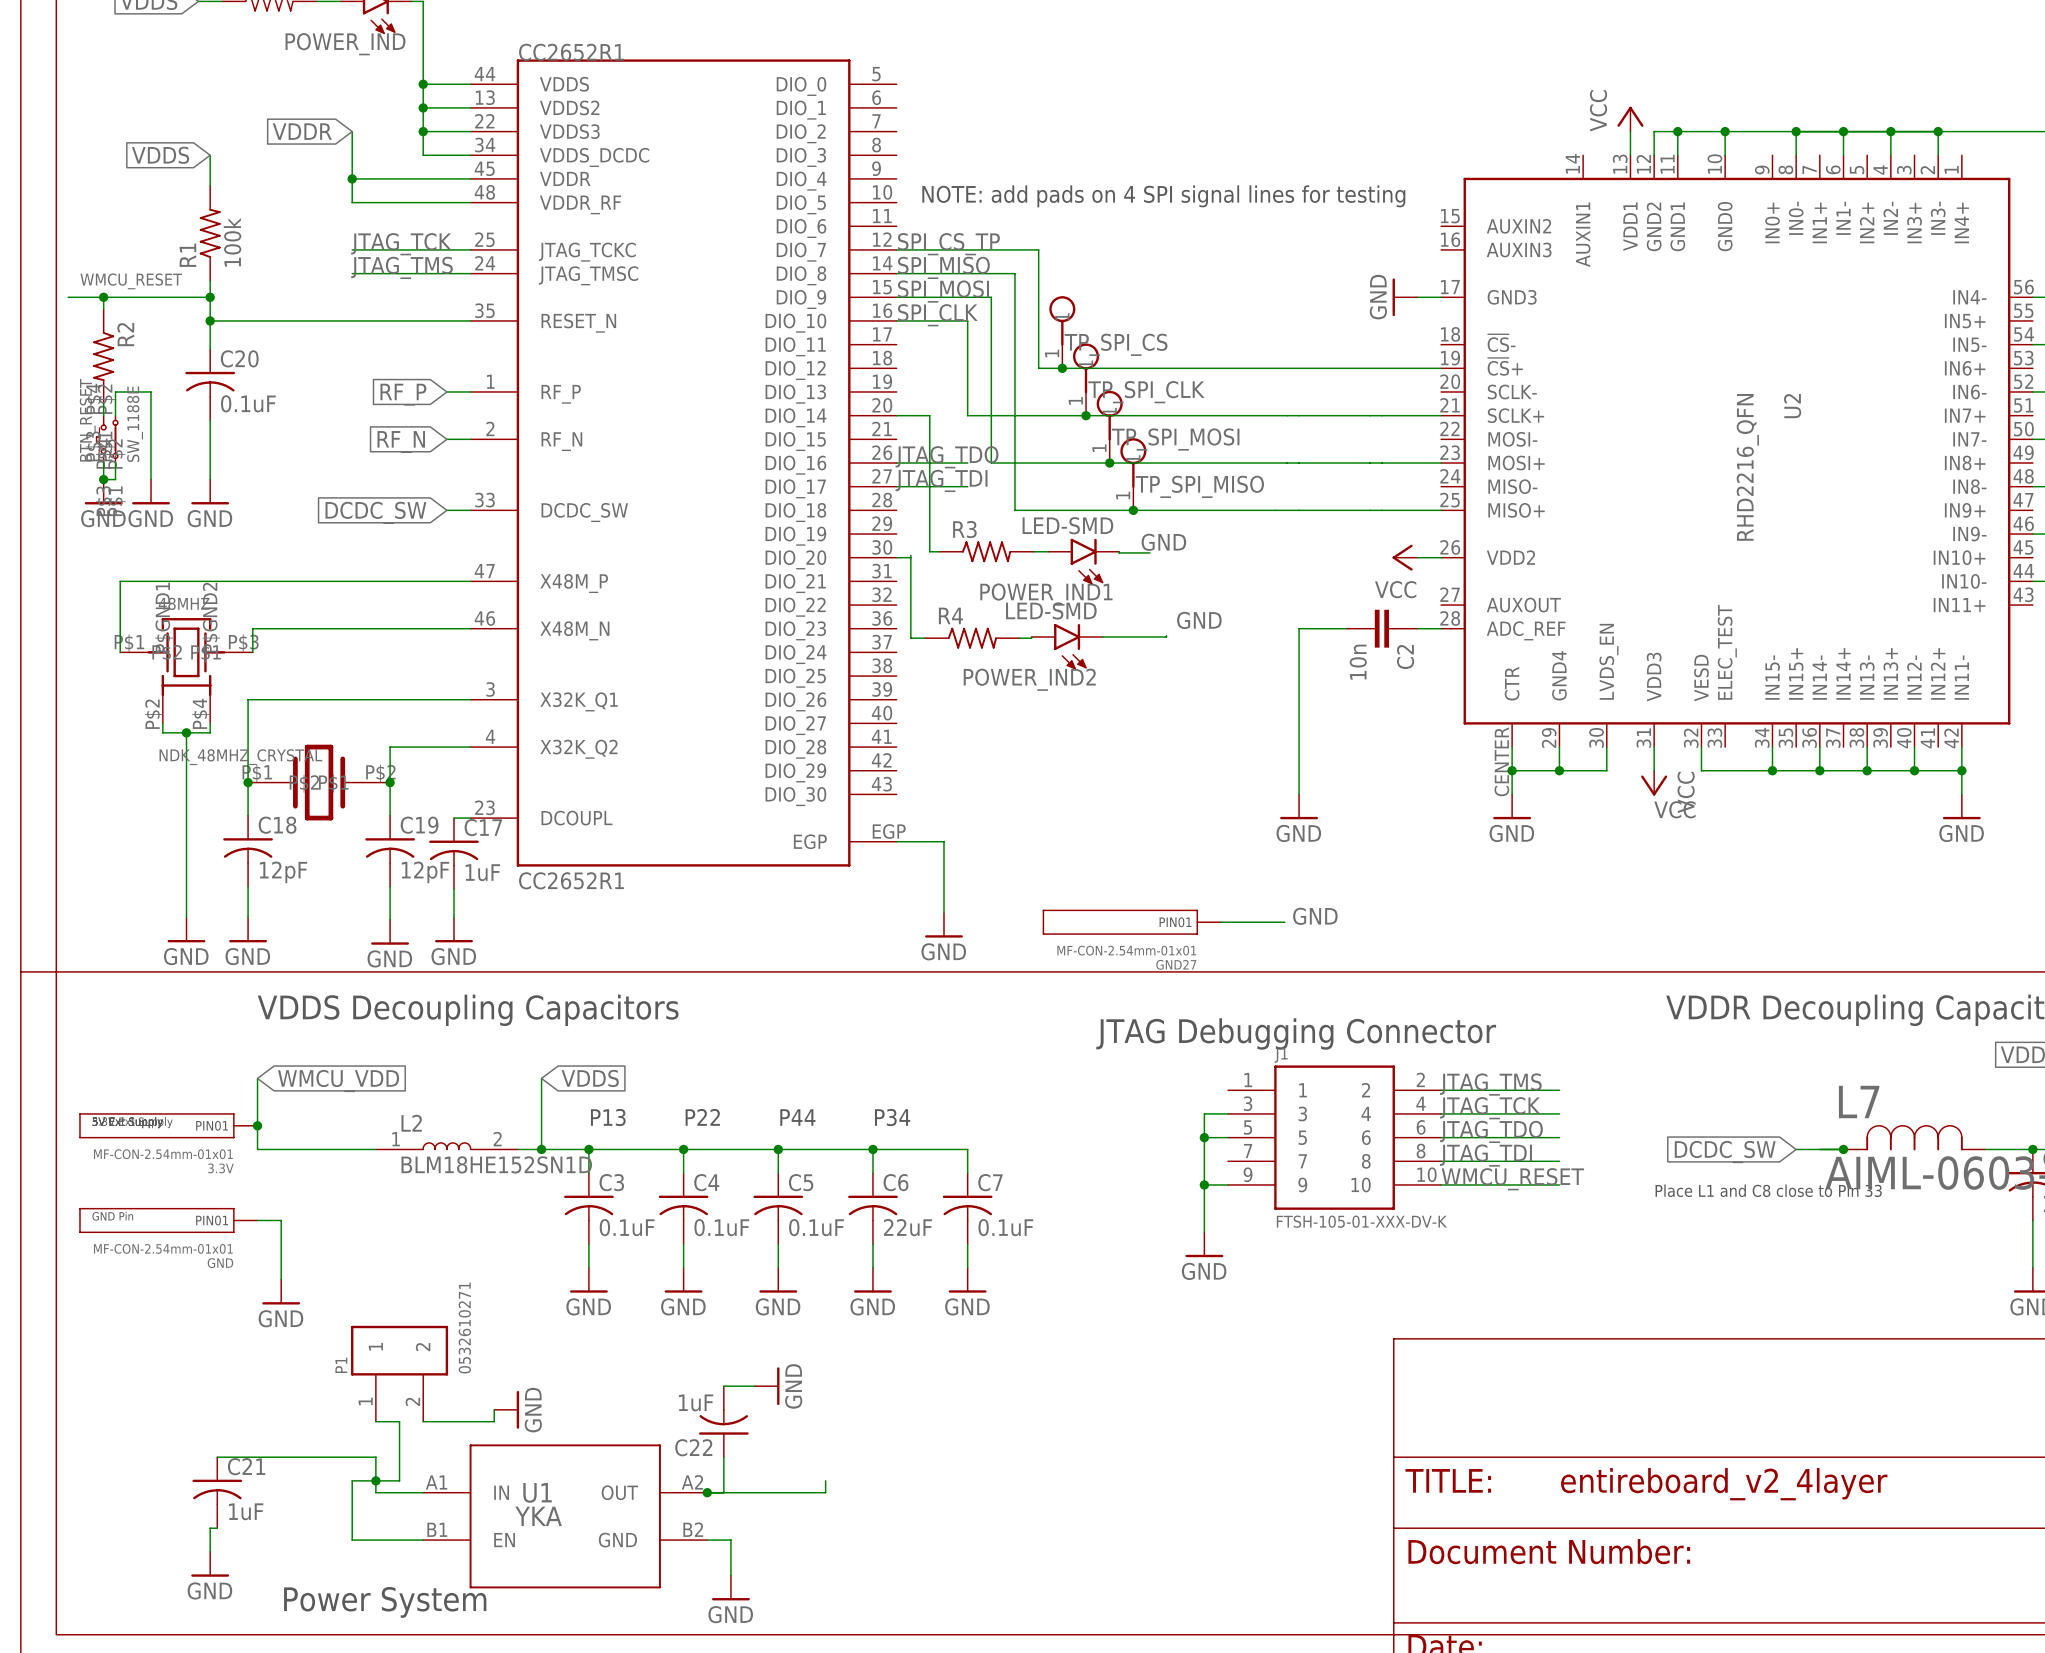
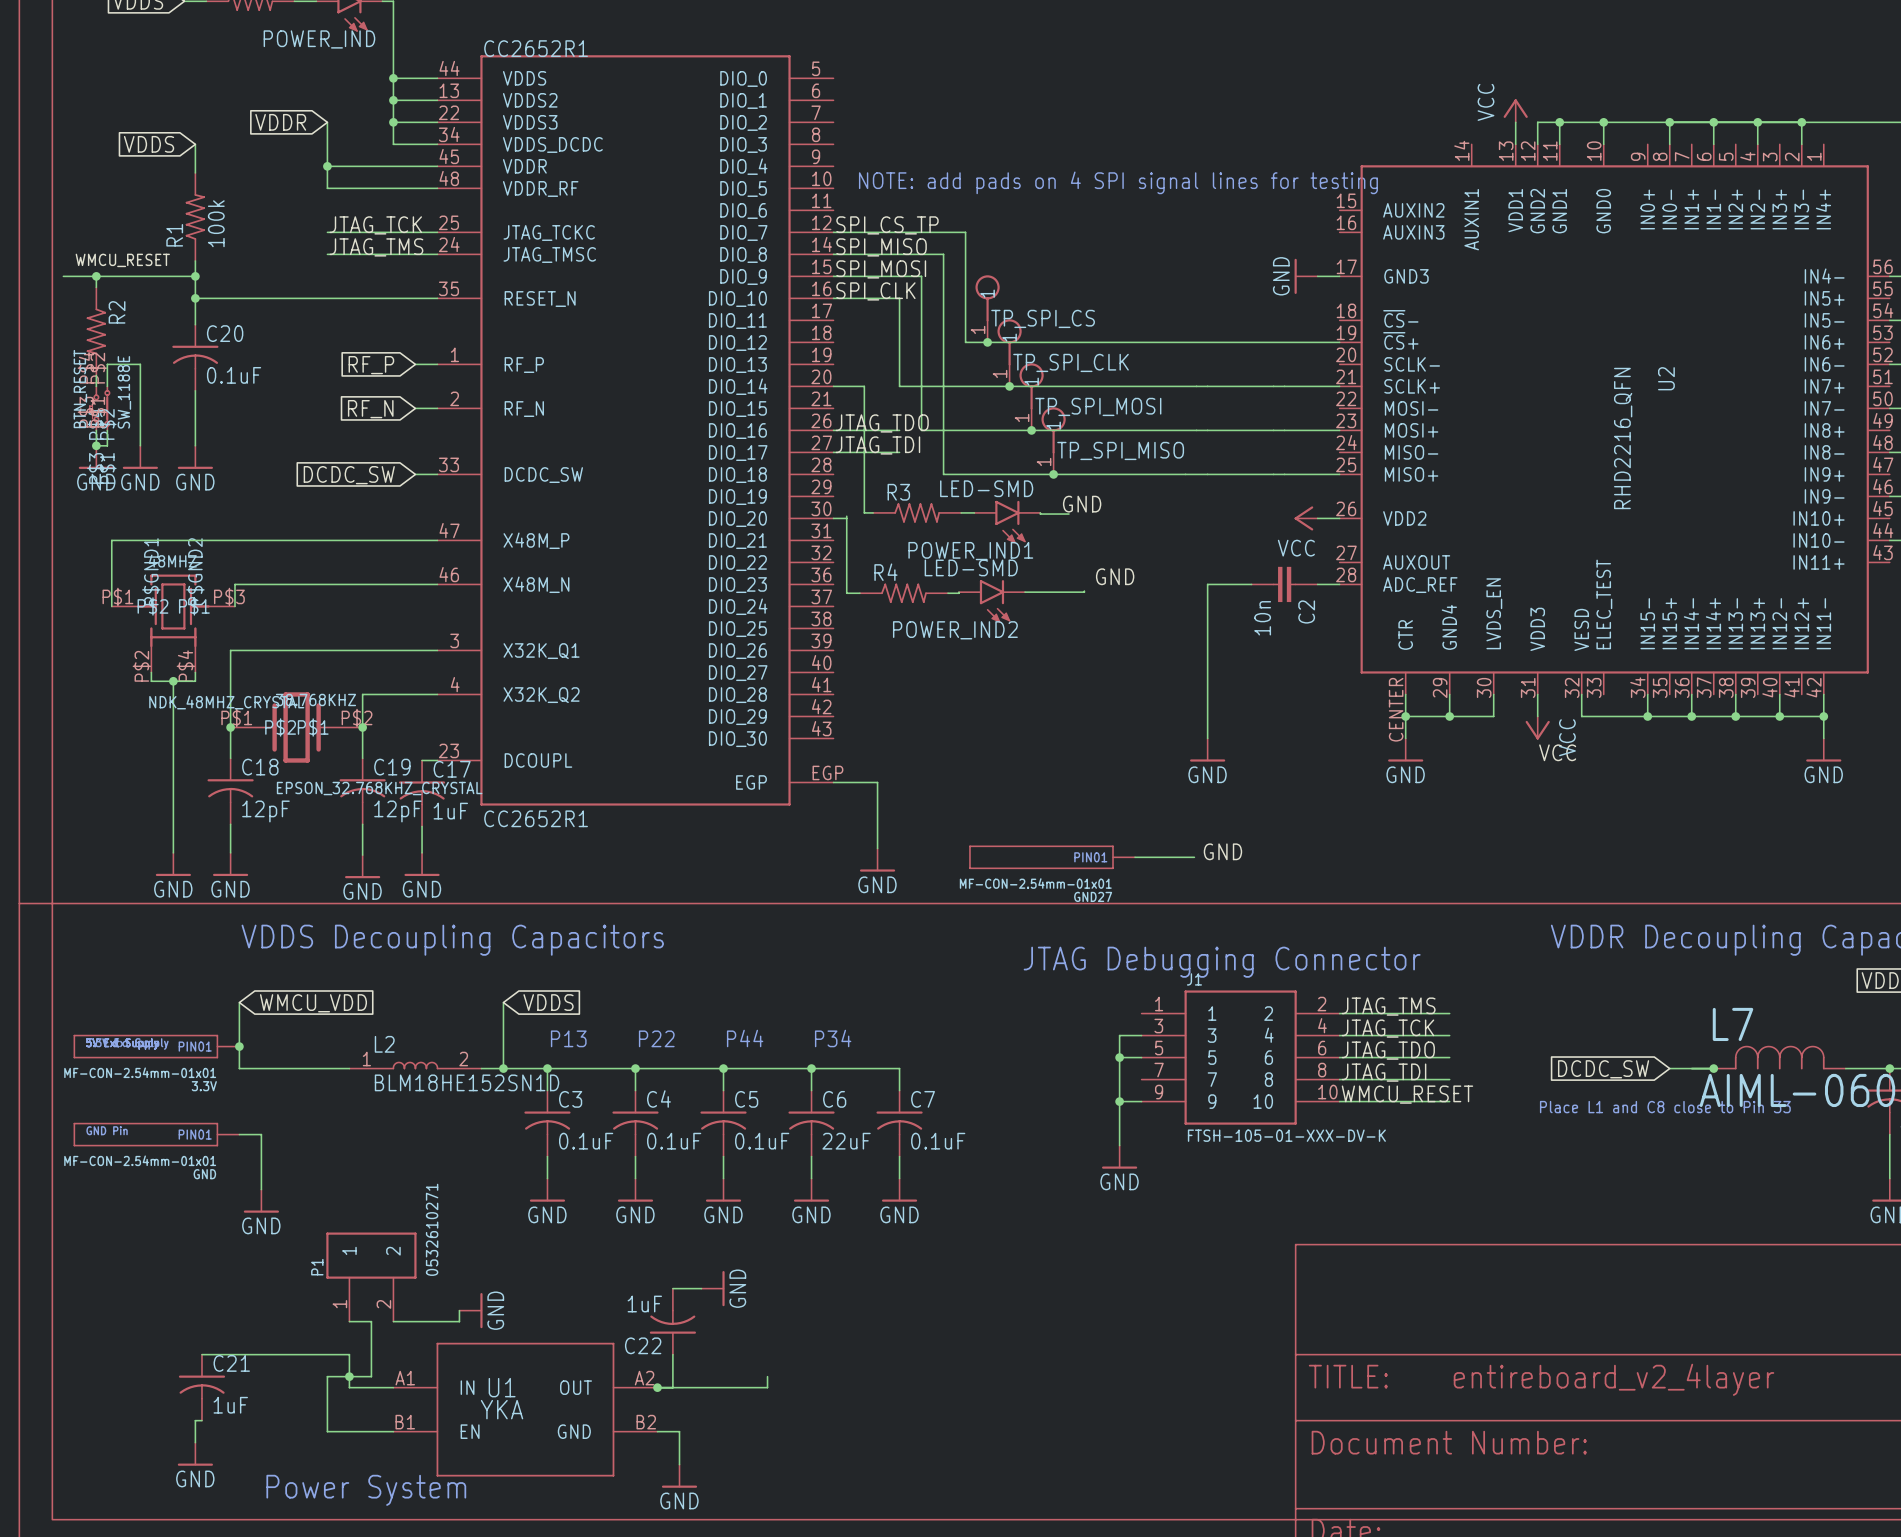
38.768KHZ name: none -> 38.768KHZ (315, 699)
38.768KHZ value: none -> EPSON_32.768KHZ_CRYSTAL (379, 788)

